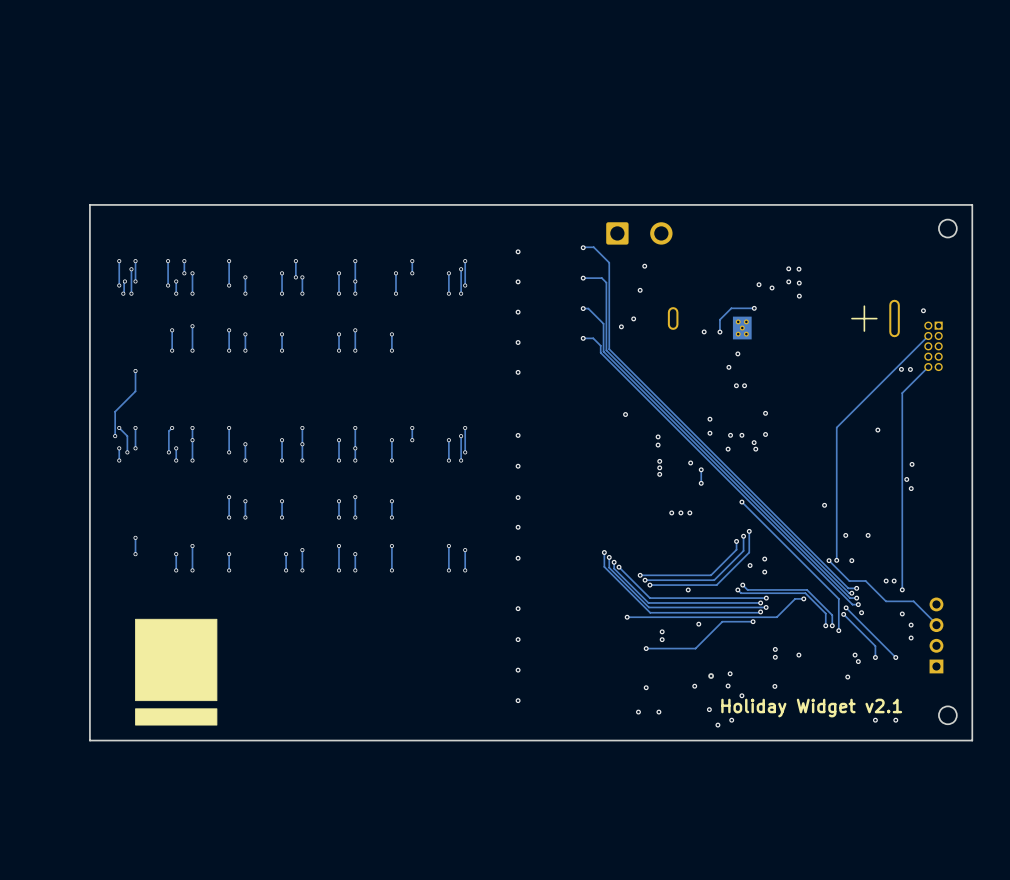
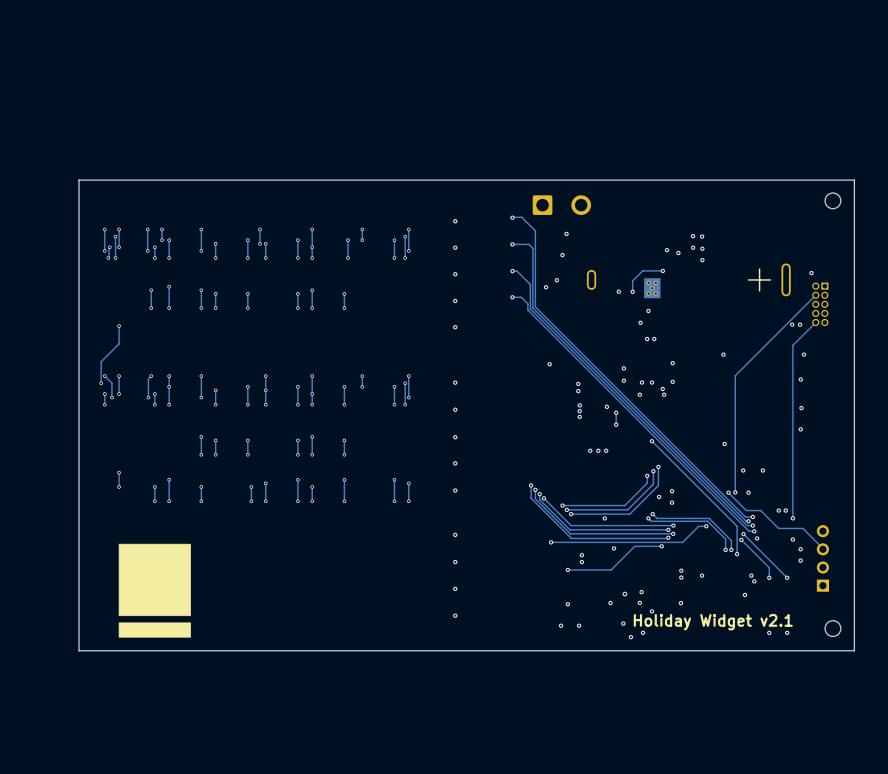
via: none -> (723, 354)
via: none -> (803, 354)
via: (877, 430) -> none
via: none -> (800, 379)
via: (906, 479) -> none

